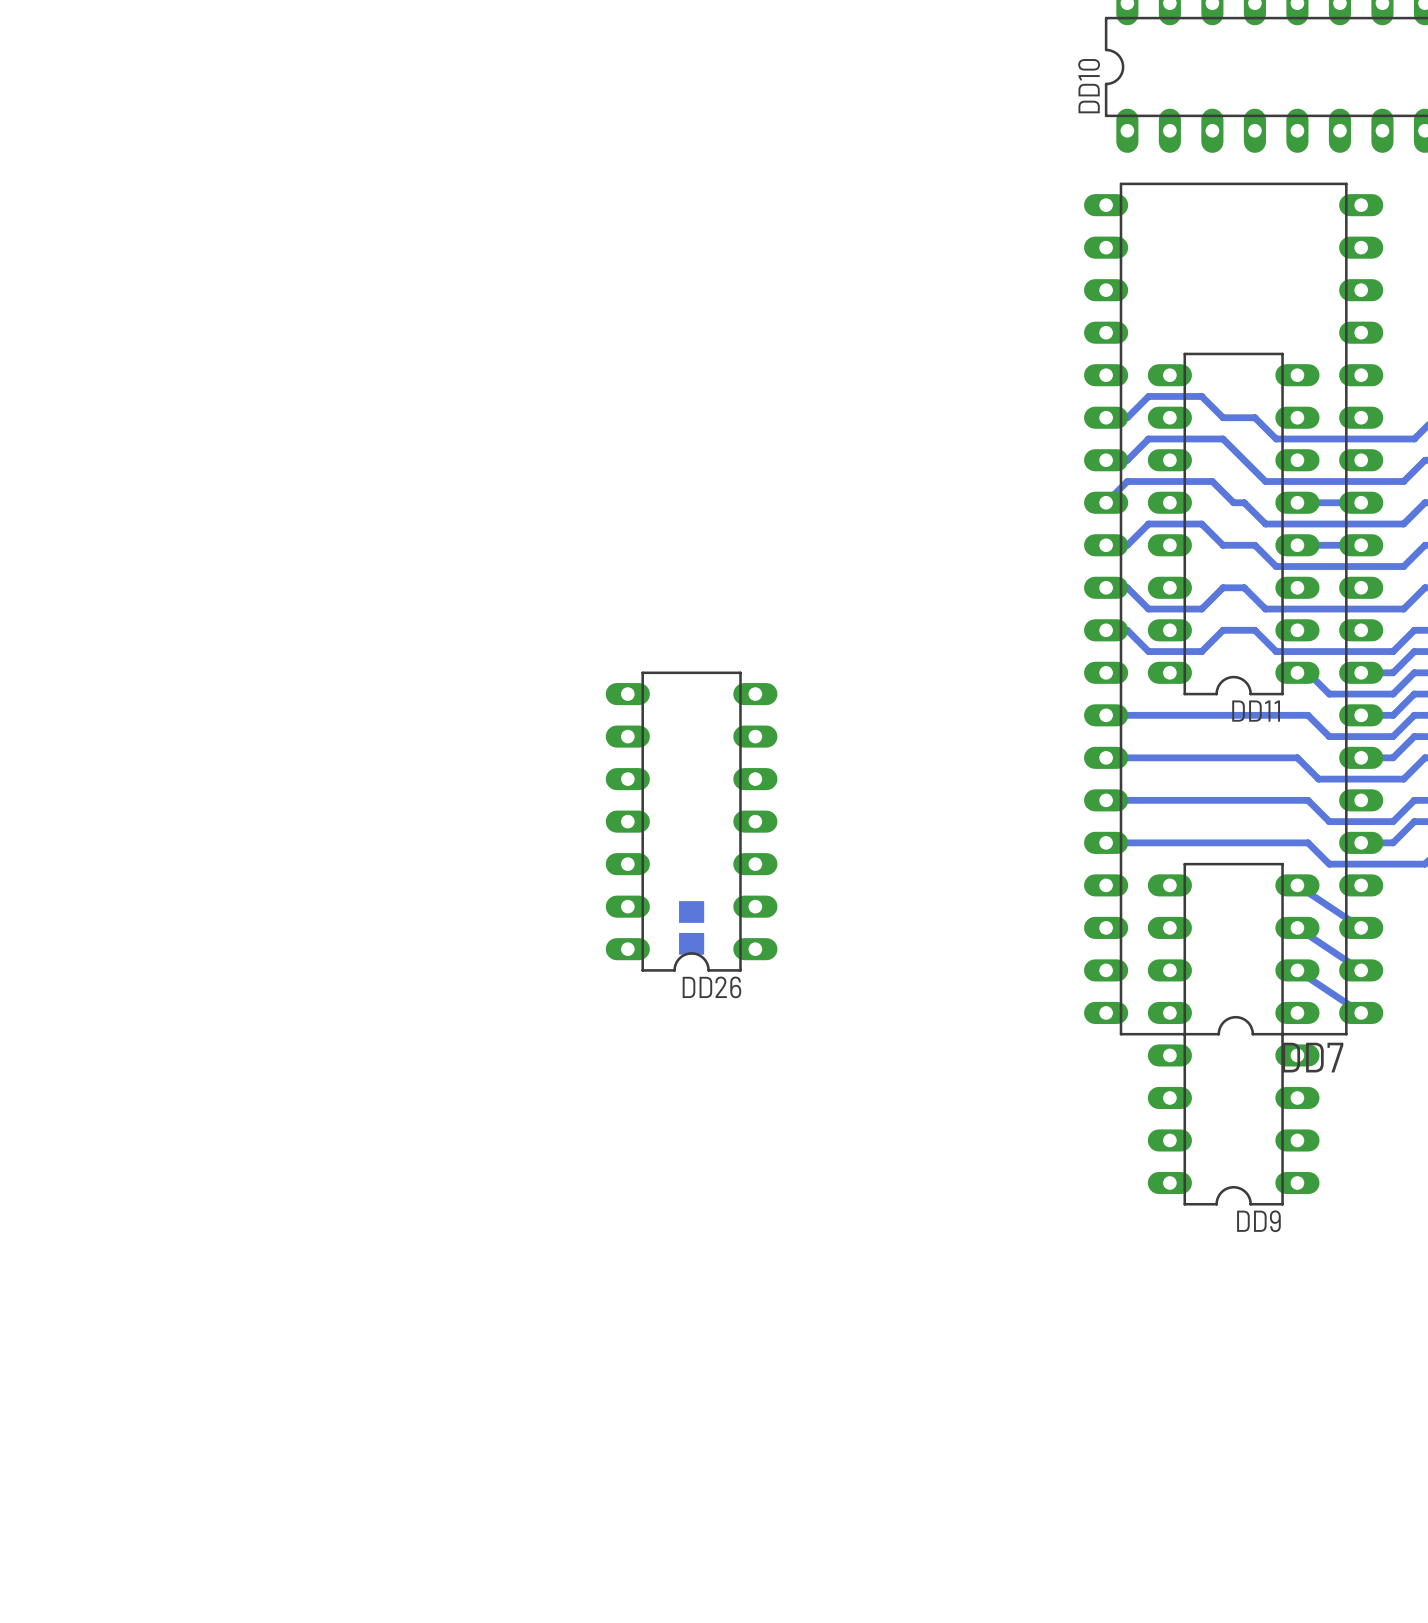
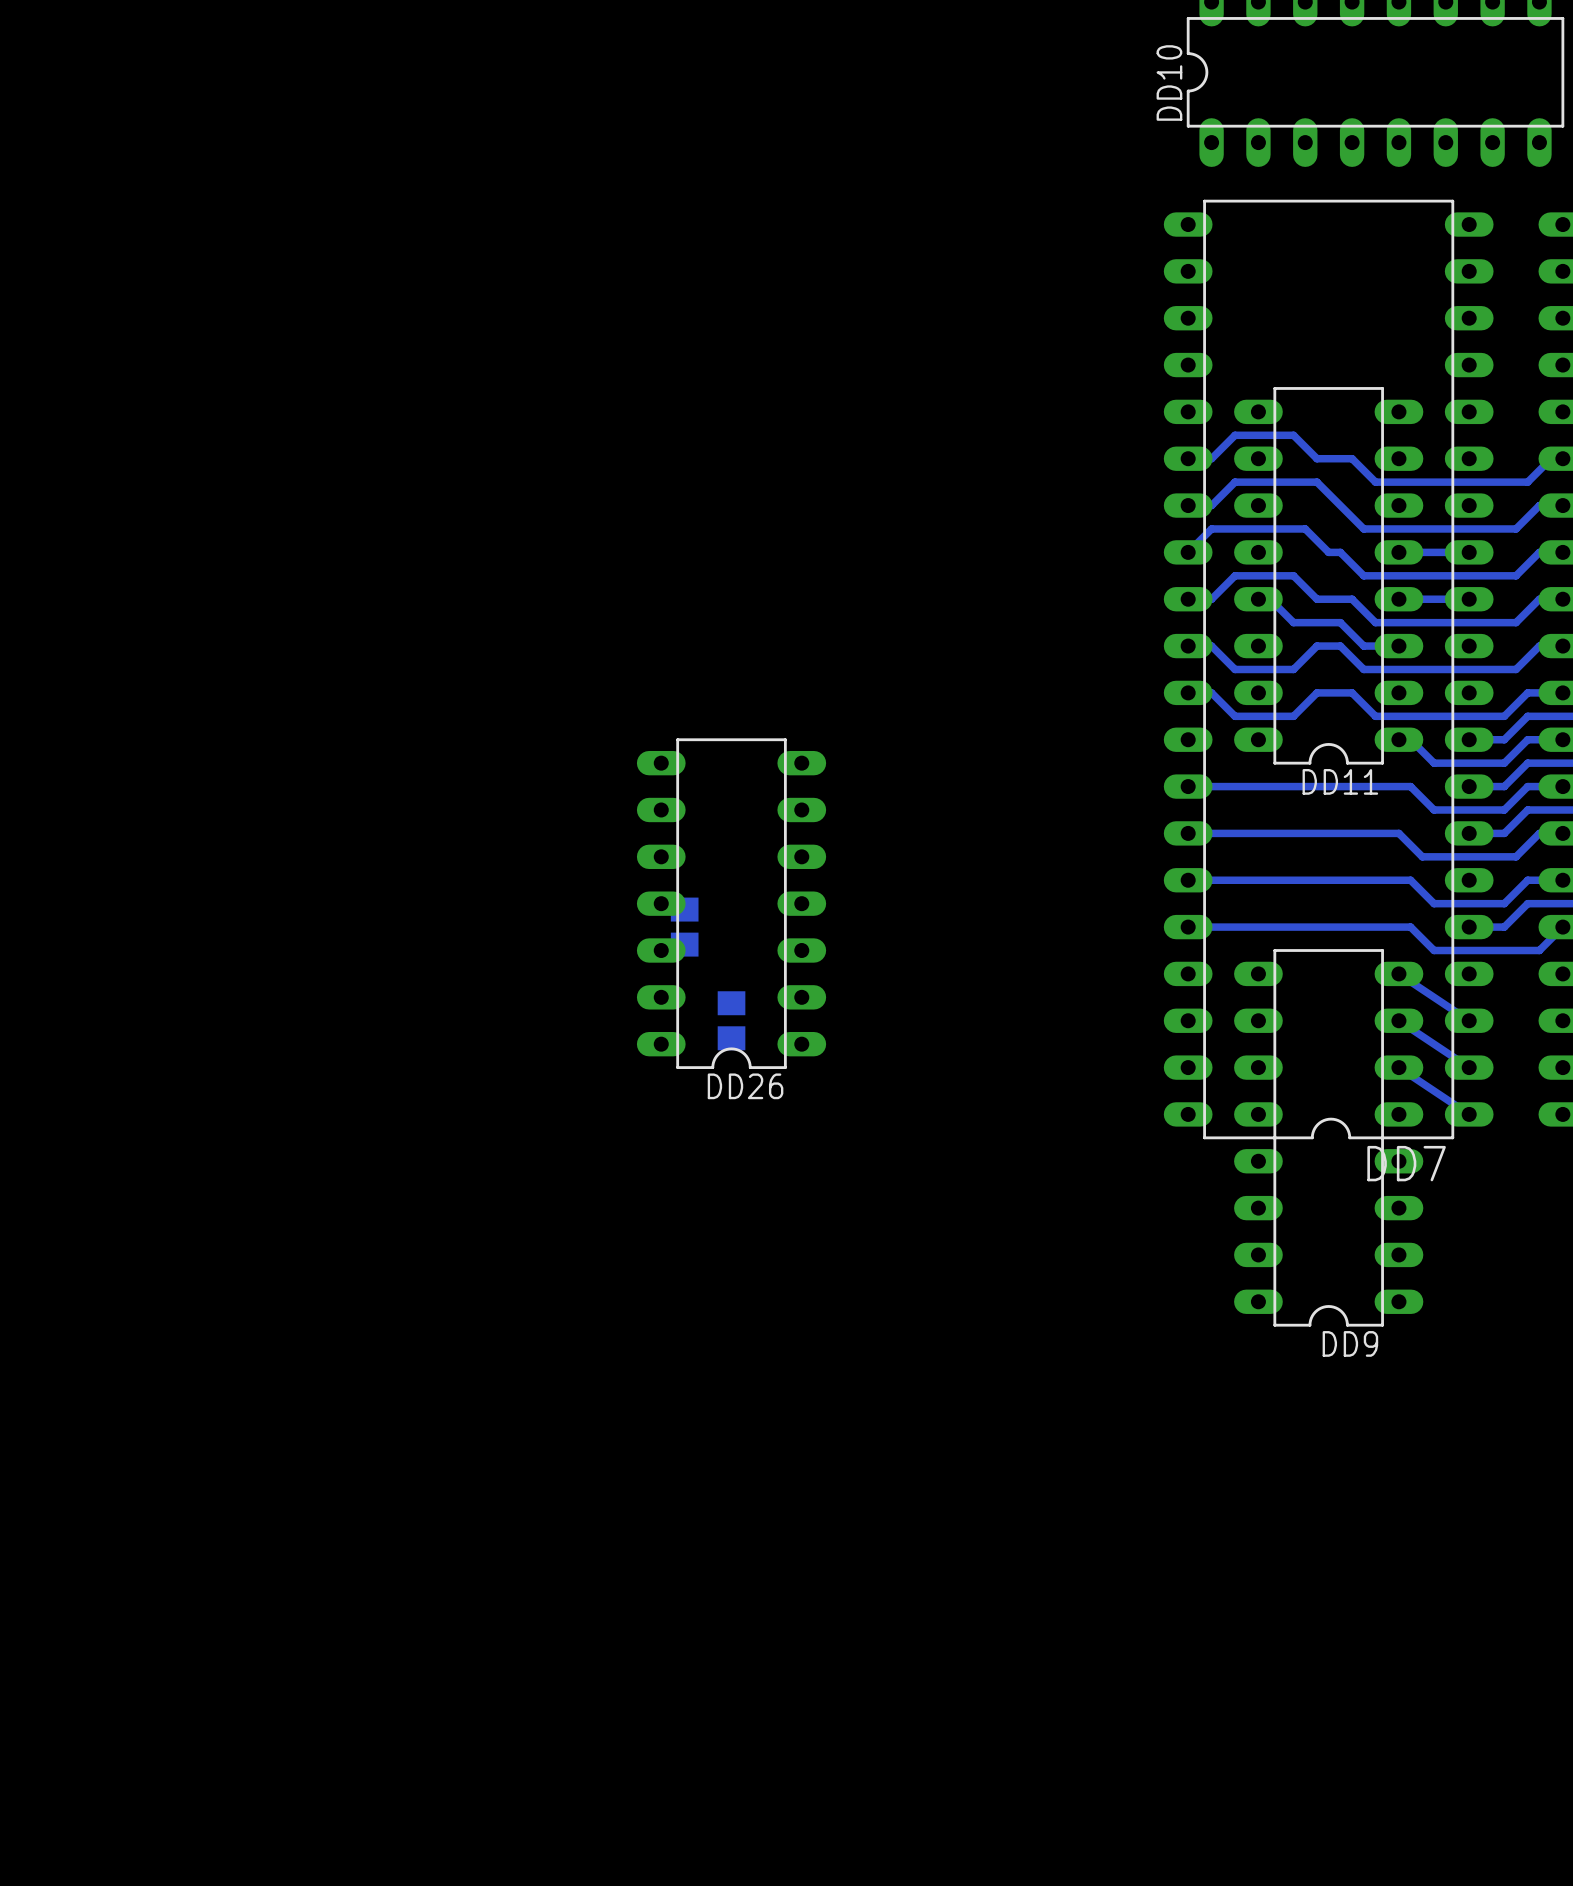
bottom track: none -> (1258, 599) (1270, 599) (1293, 622) (1340, 622) (1363, 646) (1398, 646)
part: none -> (684, 927)

